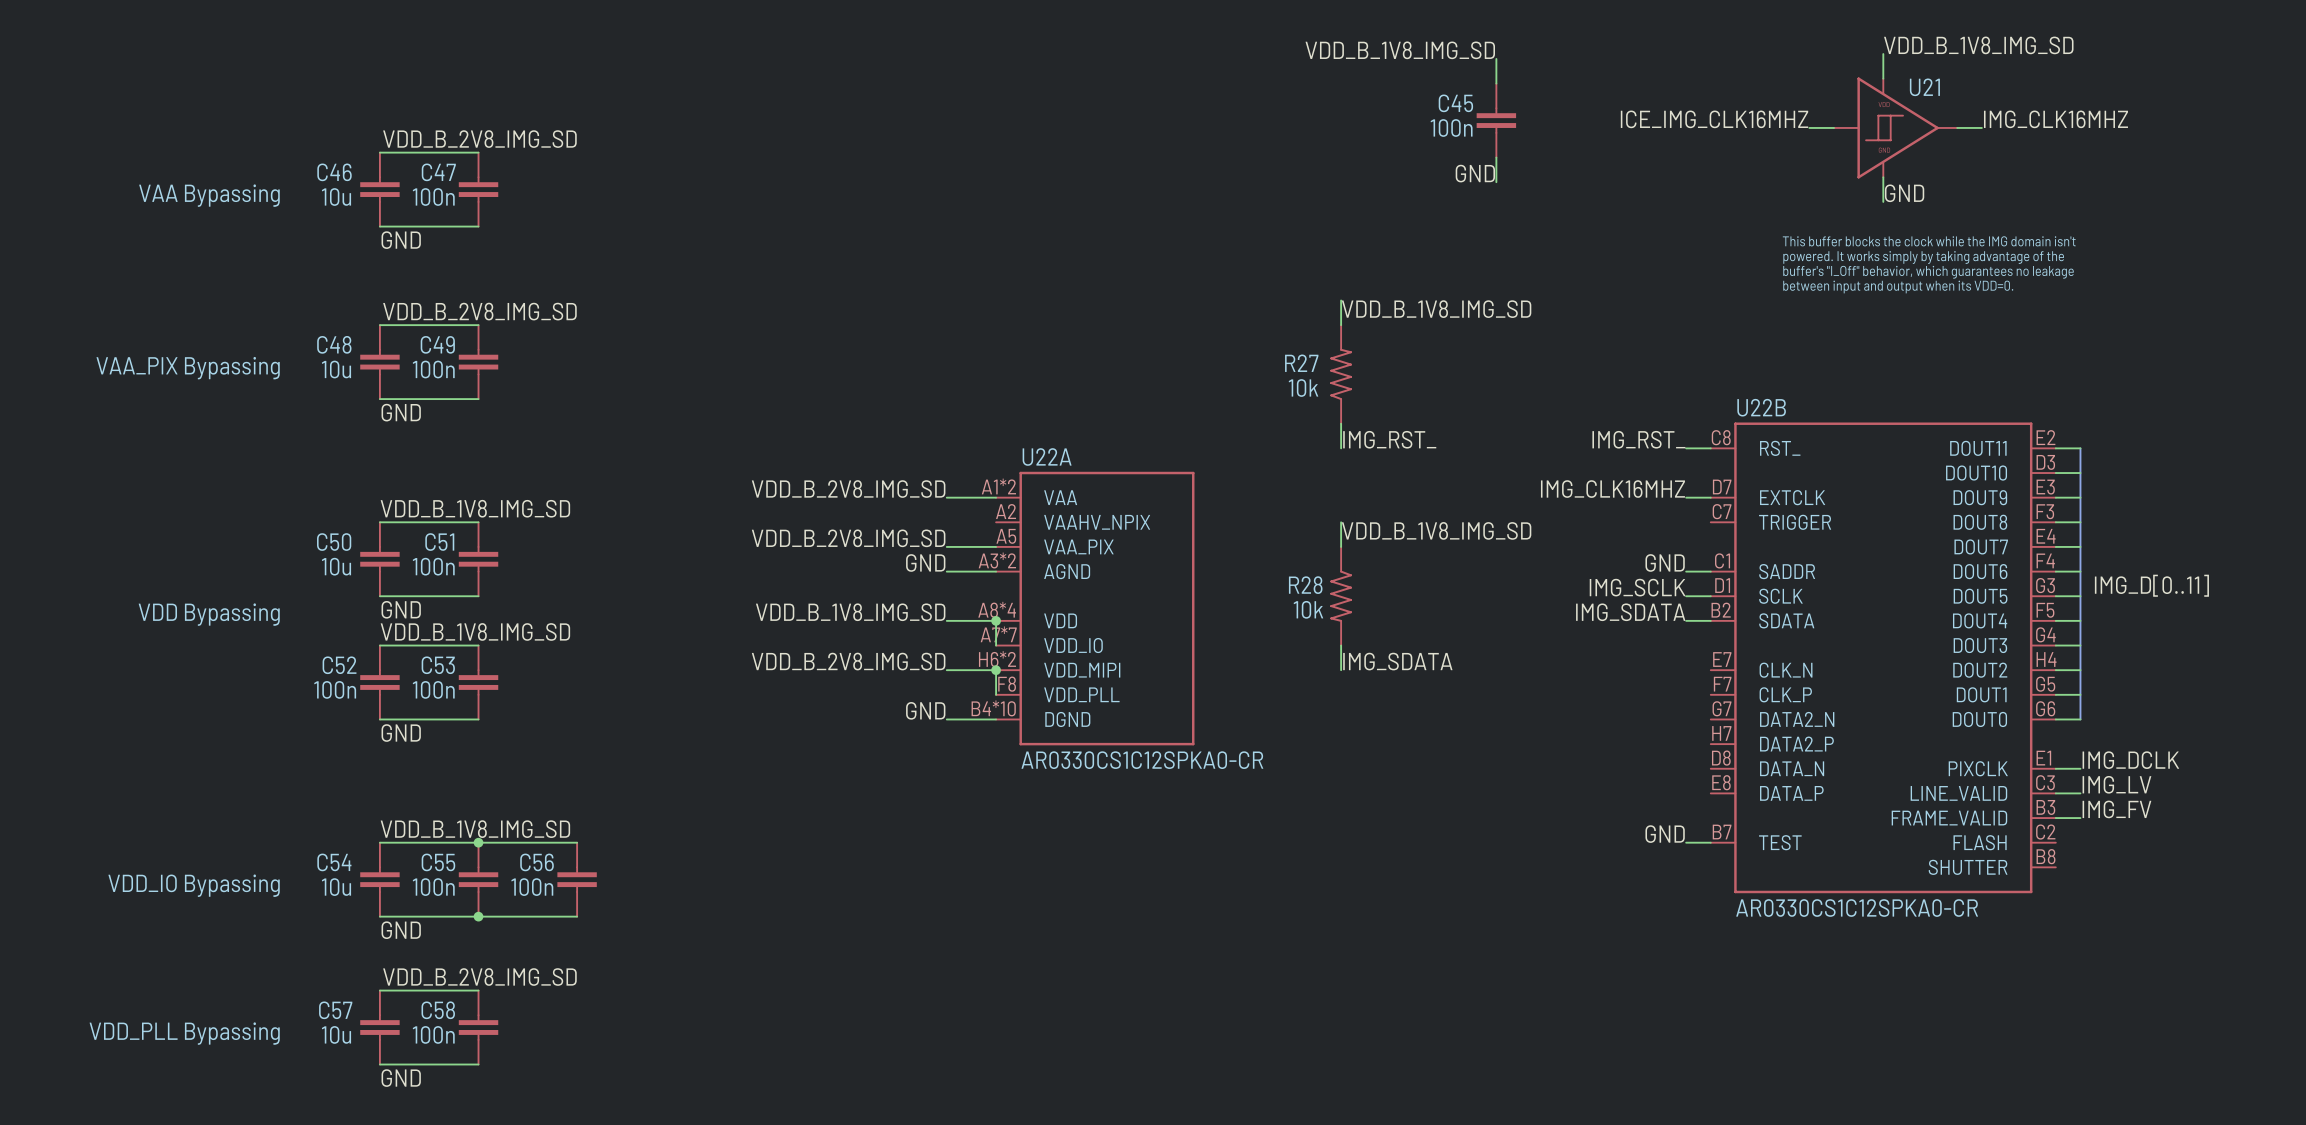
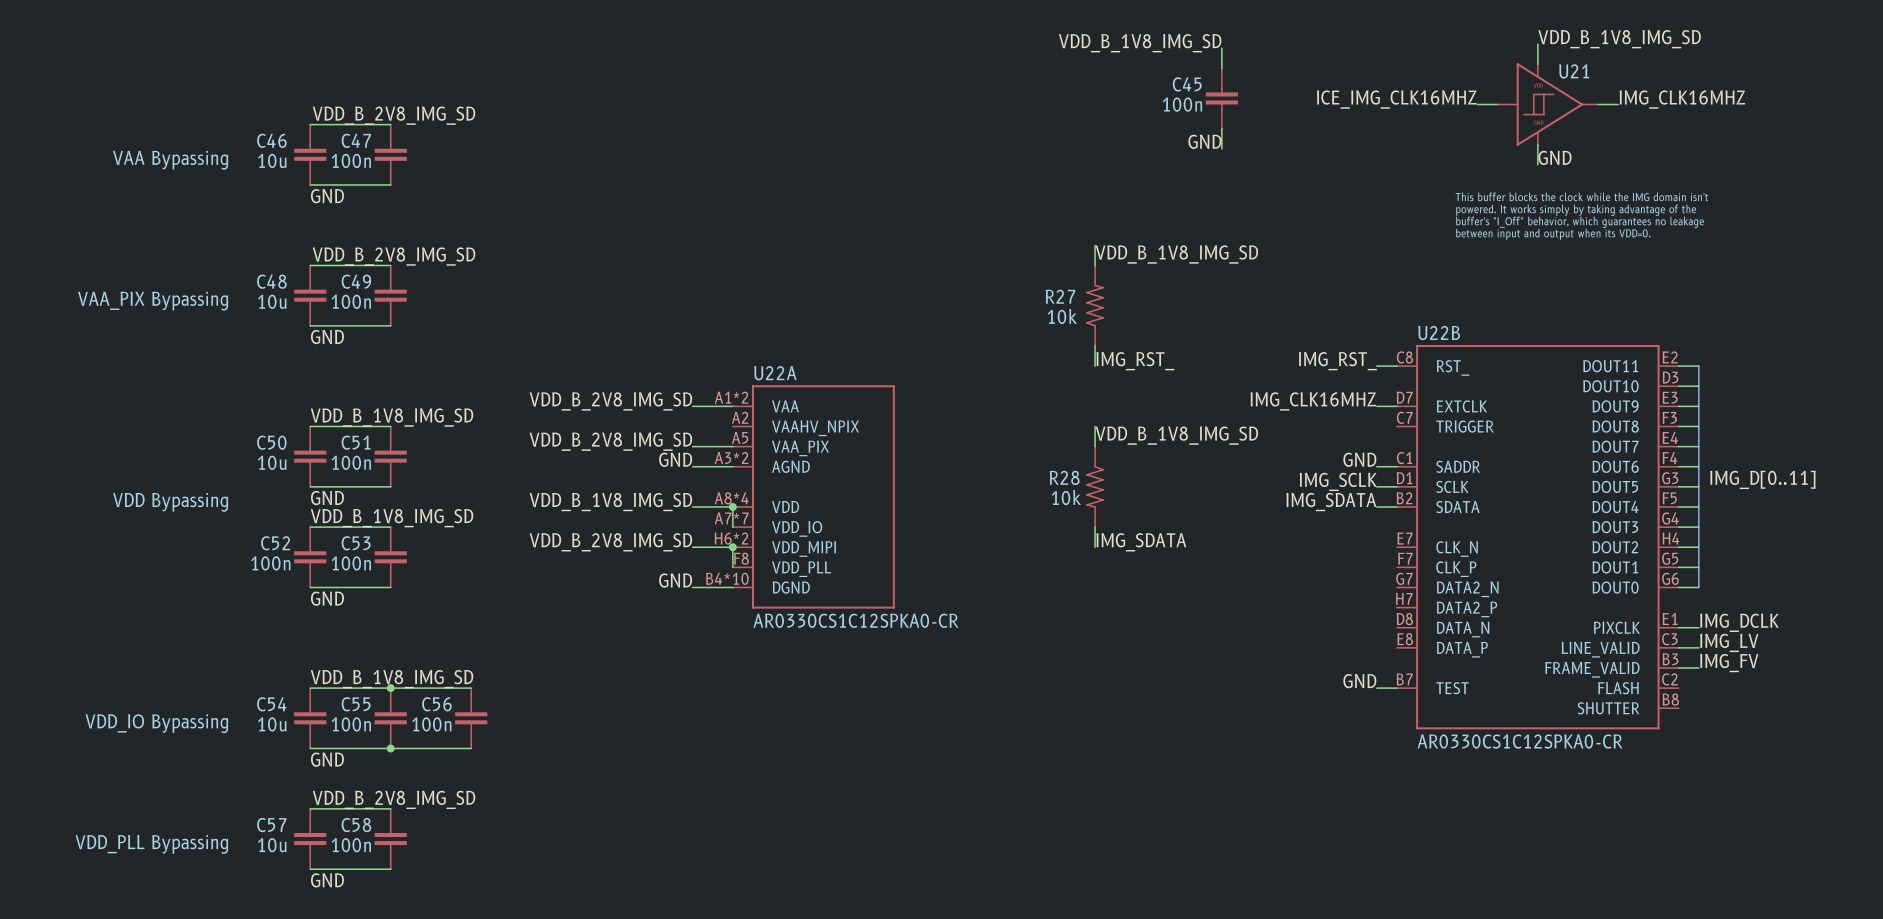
label position: VDD_B_2V8_IMG_SD (848, 489) -> VDD_B_2V8_IMG_SD (610, 401)
wire: (946, 497) (996, 497) -> (692, 406) (732, 406)
label position: VDD_B_2V8_IMG_SD (848, 538) -> VDD_B_2V8_IMG_SD (610, 441)
wire: (946, 546) (996, 546) -> (692, 446) (732, 446)
label: none -> GND (675, 459)
label: GND (925, 562) -> none
wire: (946, 571) (996, 571) -> (692, 466) (732, 466)
U22A position: (1095, 608) -> (813, 496)
label position: VDD_B_1V8_IMG_SD (850, 612) -> VDD_B_1V8_IMG_SD (610, 502)
junction: none -> (732, 506)
wire: (946, 620) (996, 620) (996, 645) -> (692, 506) (732, 506) (732, 527)
junction: (996, 620) -> none
label position: VDD_B_2V8_IMG_SD (848, 661) -> VDD_B_2V8_IMG_SD (610, 542)
junction: none -> (732, 547)
wire: (946, 670) (996, 670) (996, 694) -> (692, 547) (732, 547) (732, 567)
junction: (996, 670) -> none
label: none -> GND (675, 580)
label: GND (925, 710) -> none
wire: (946, 719) (996, 719) -> (692, 587) (732, 587)

